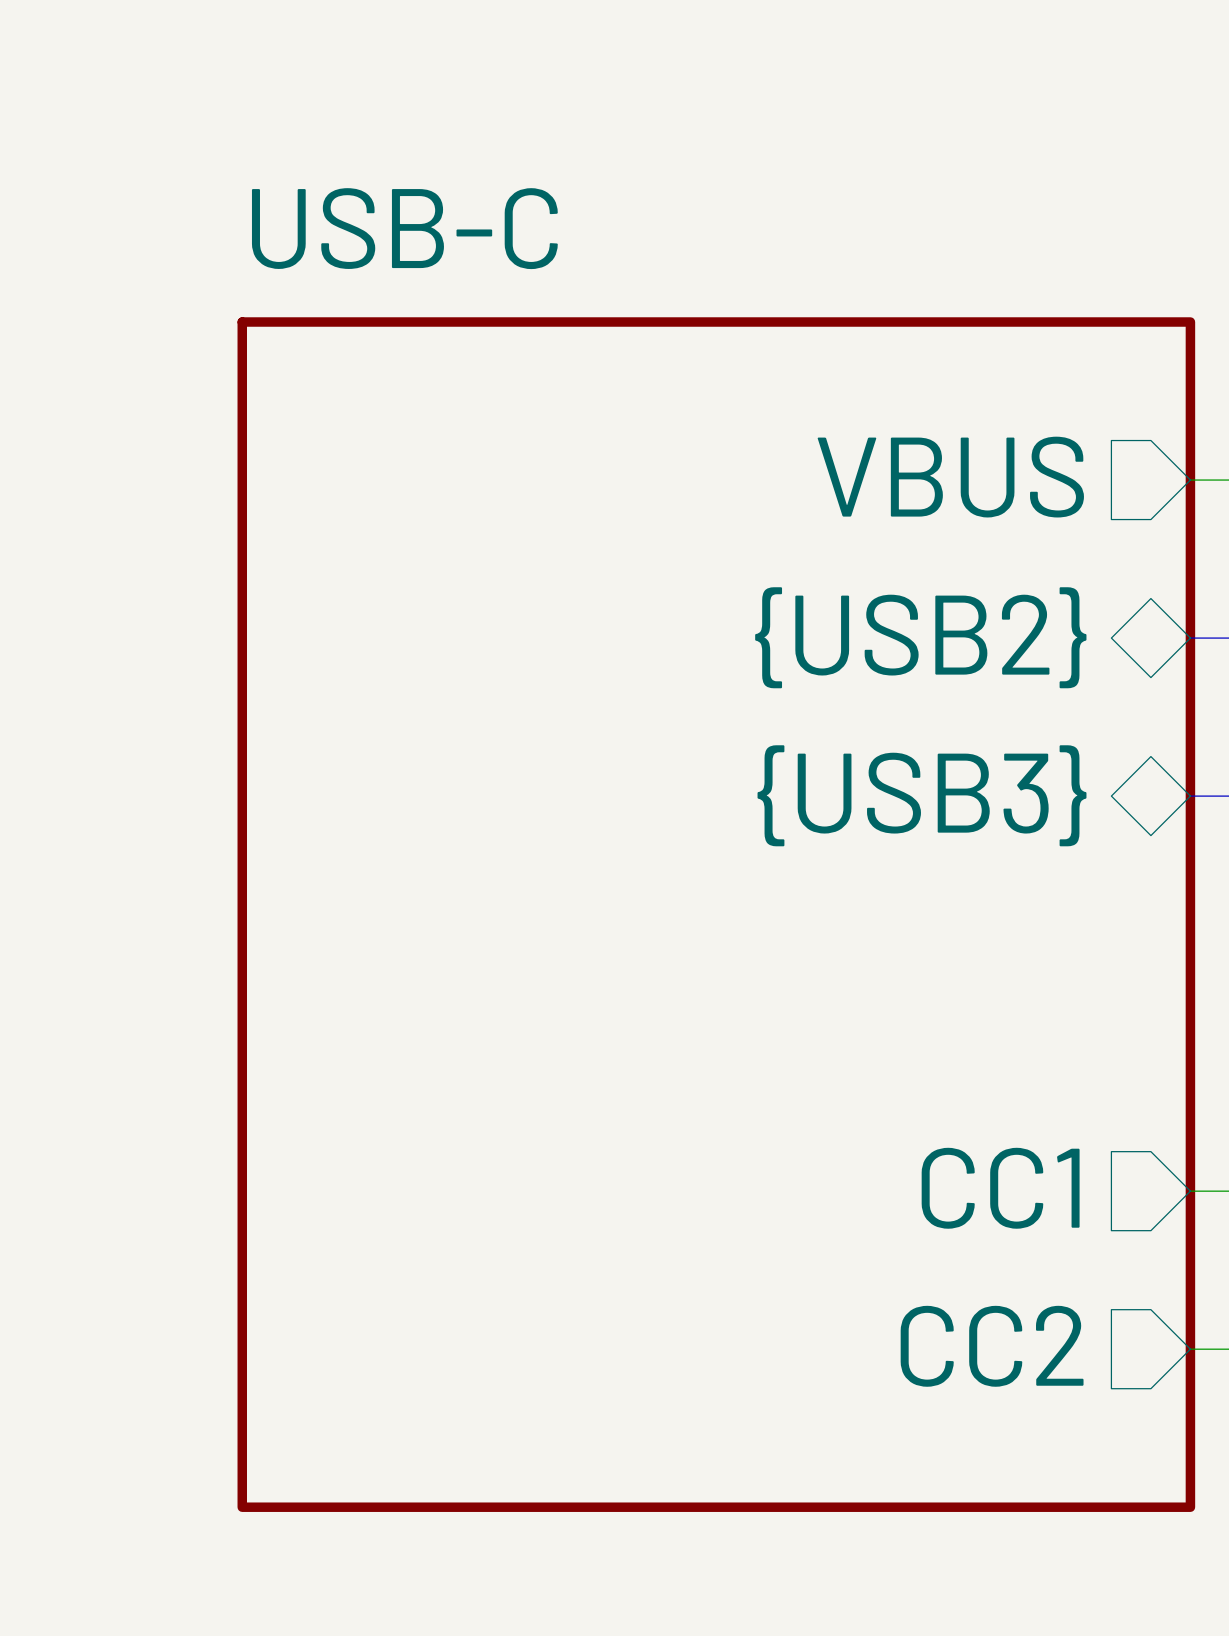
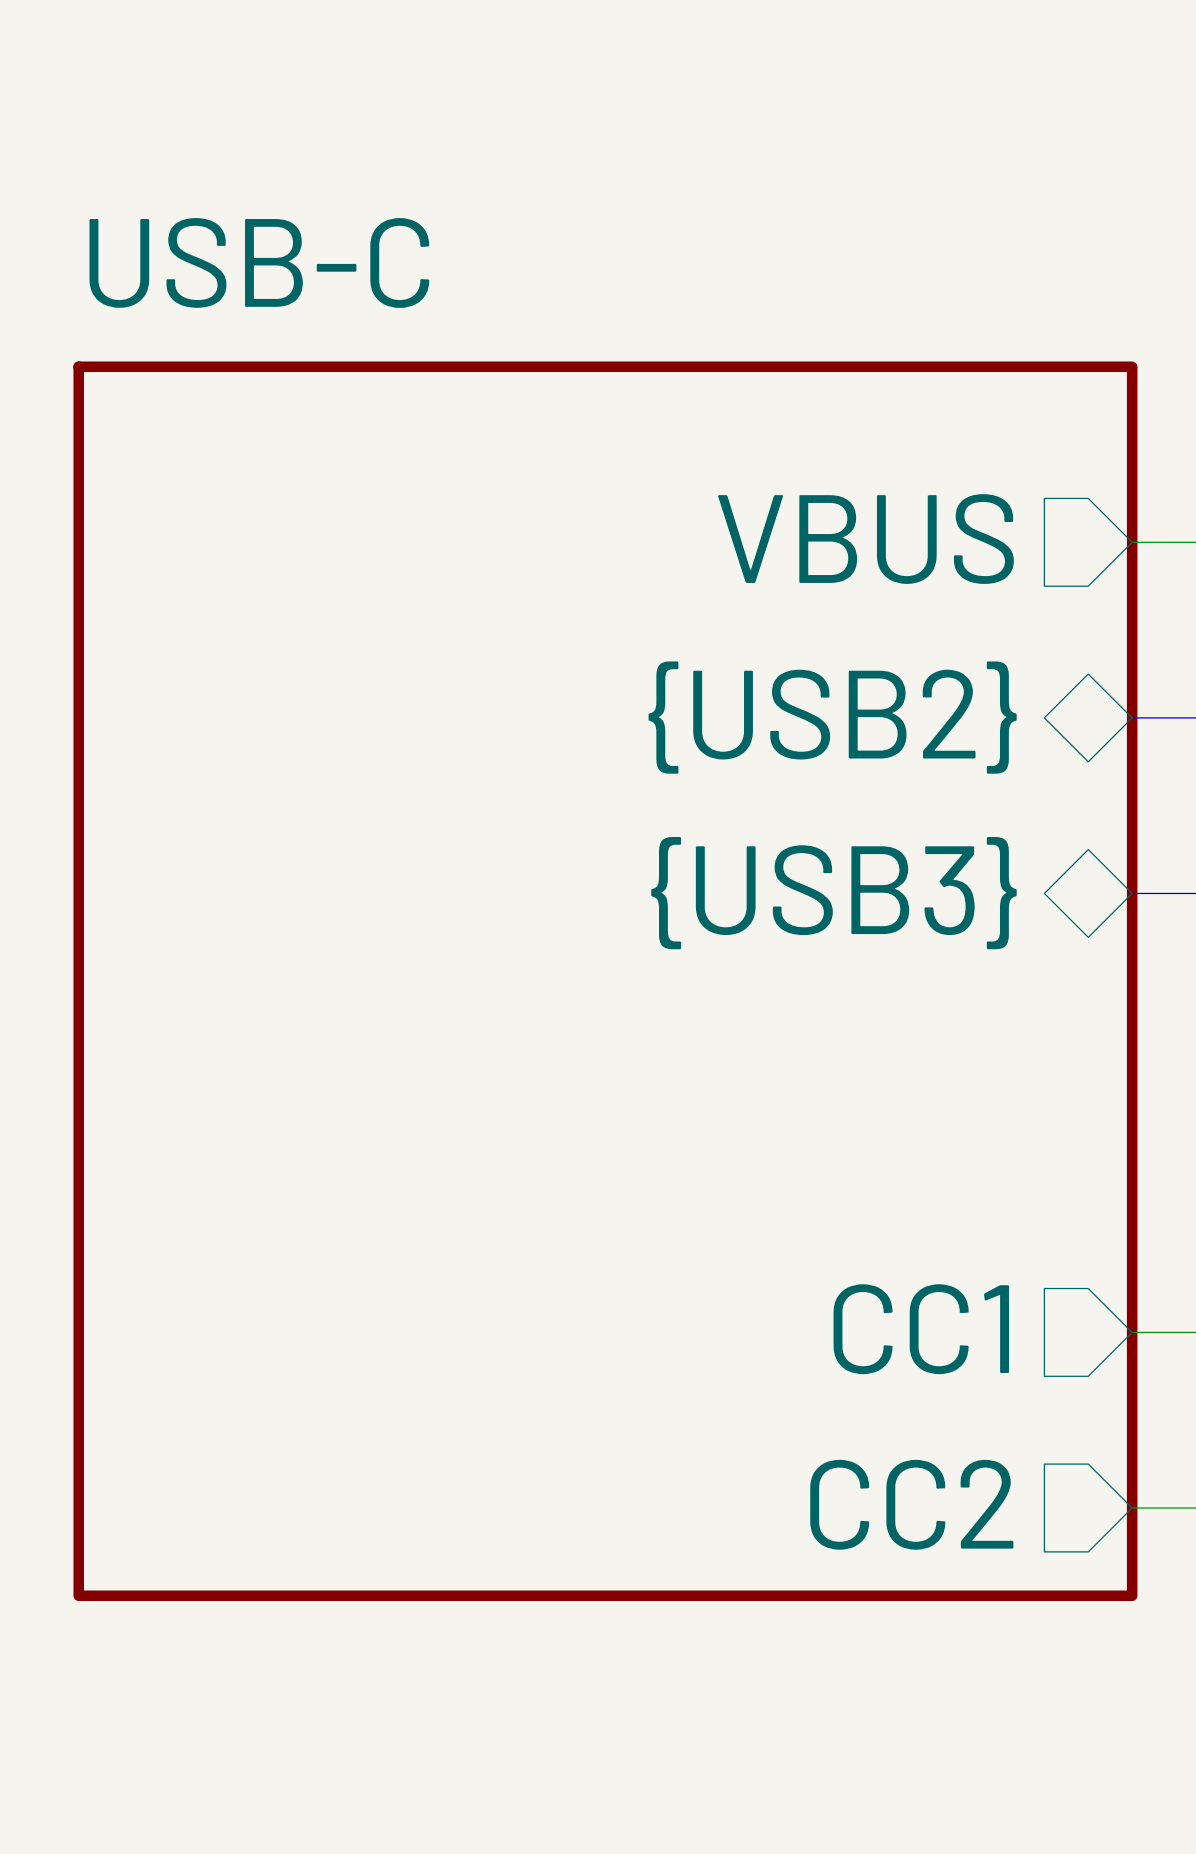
sheet USB-C shape: [237, 317, 1196, 1512] -> [73, 361, 1138, 1602]

